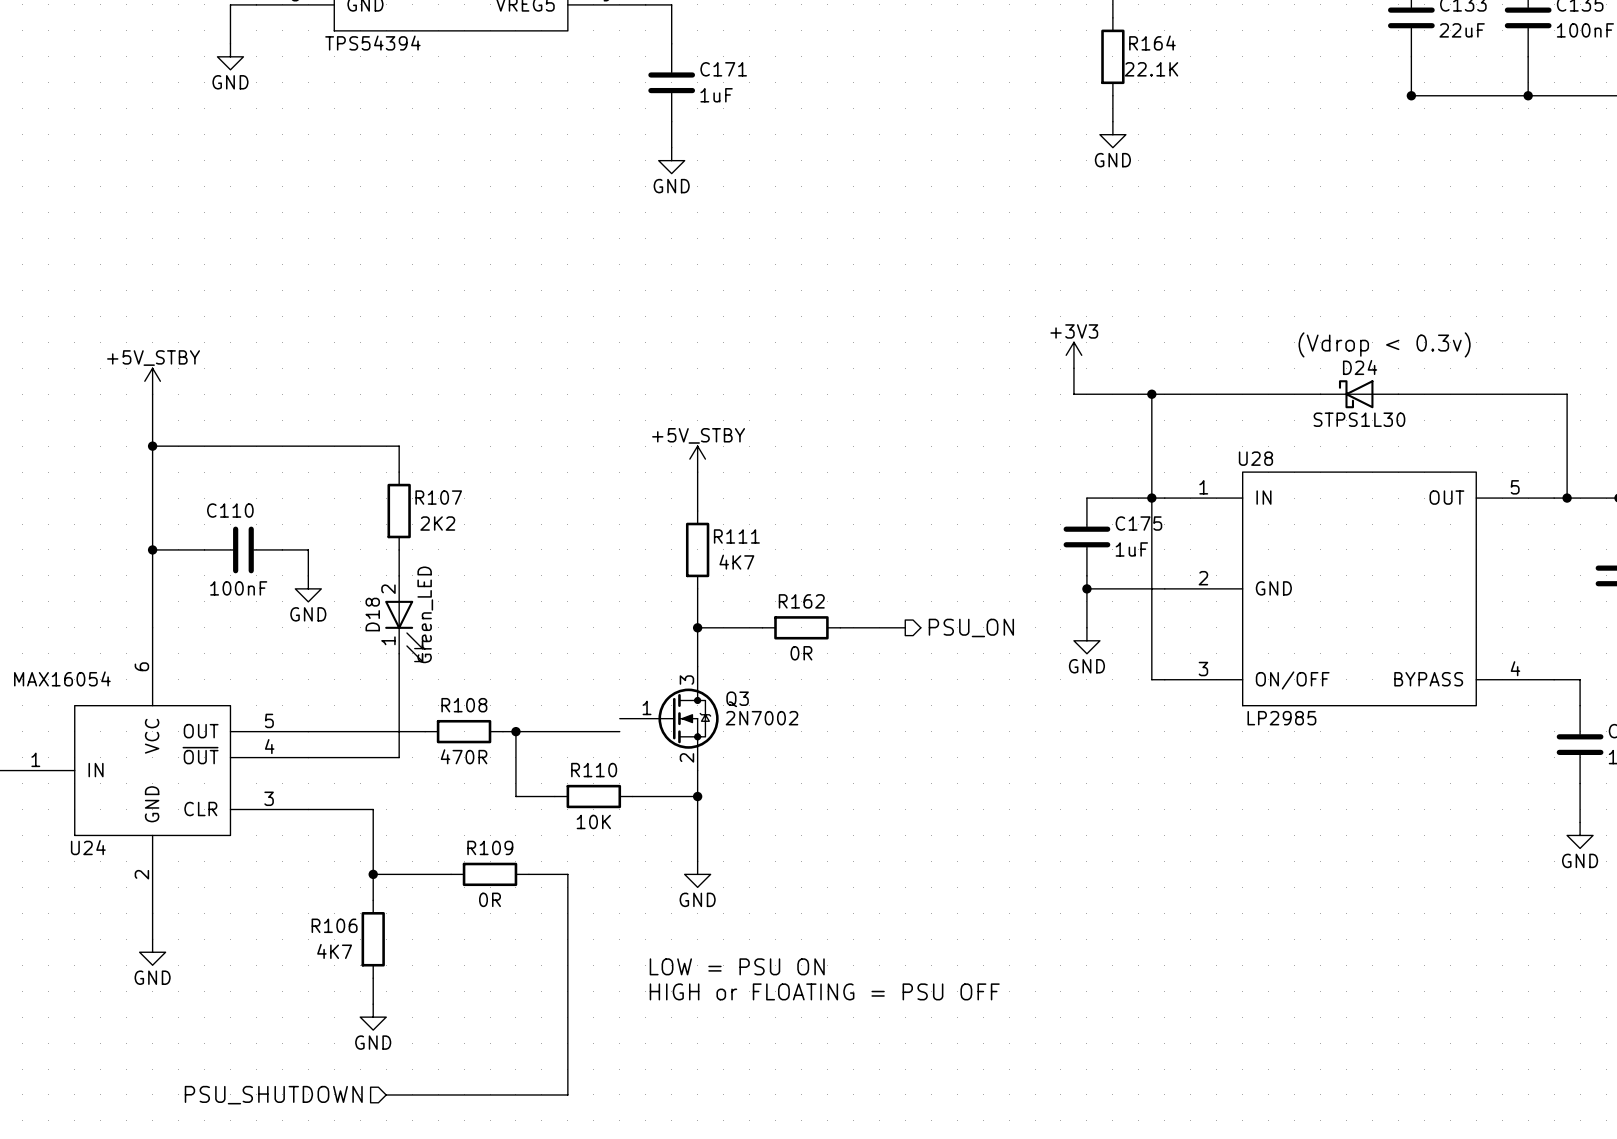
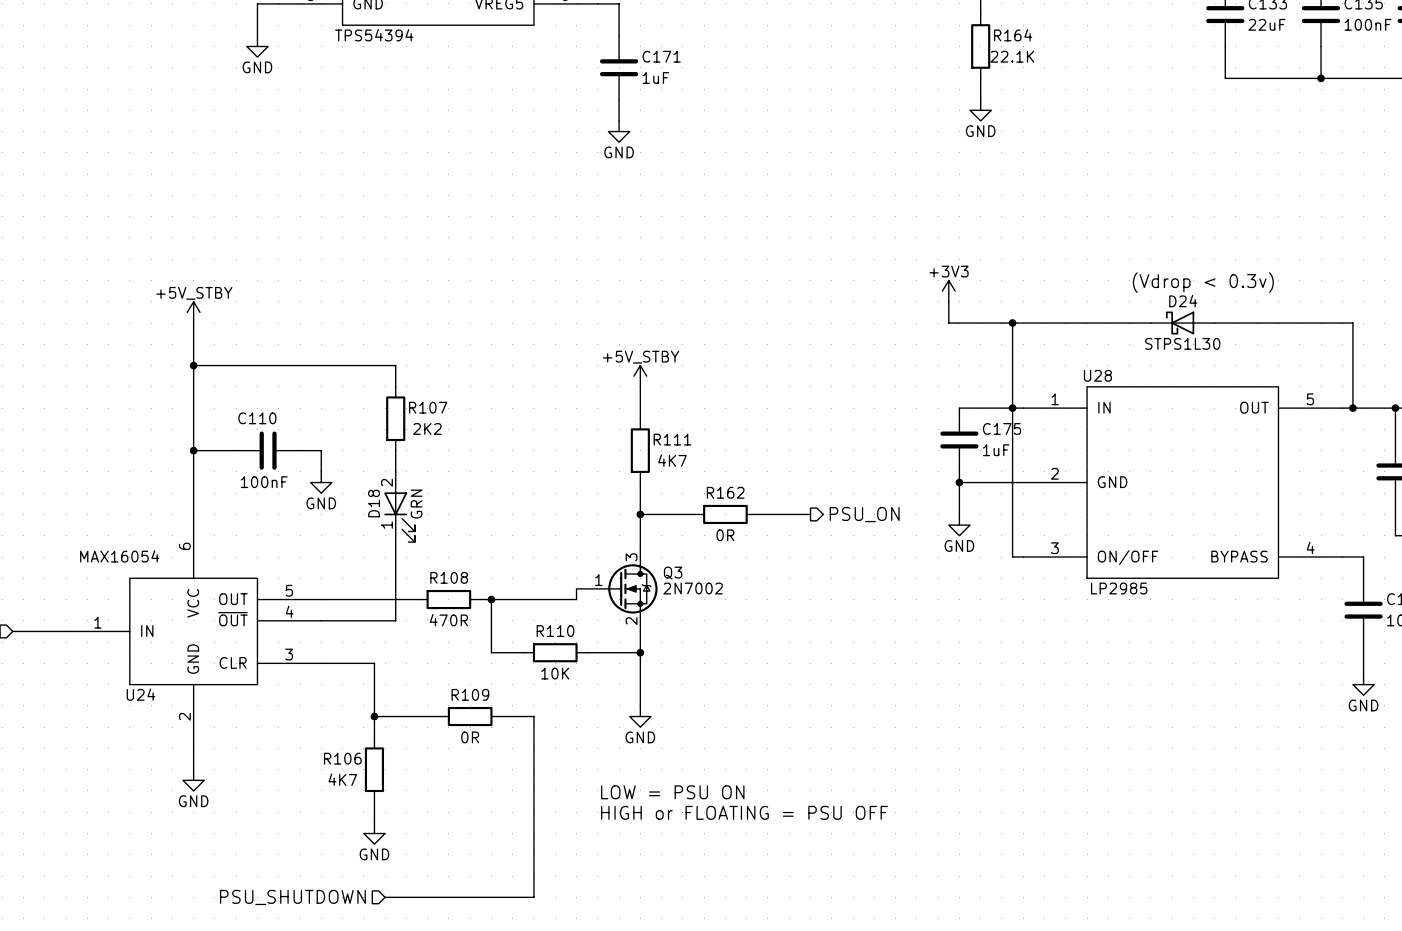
junction: (1411, 95) -> none
D18 value: Green_LED (425, 614) -> GRN (416, 504)
wire: none -> (576, 588) (576, 599)

